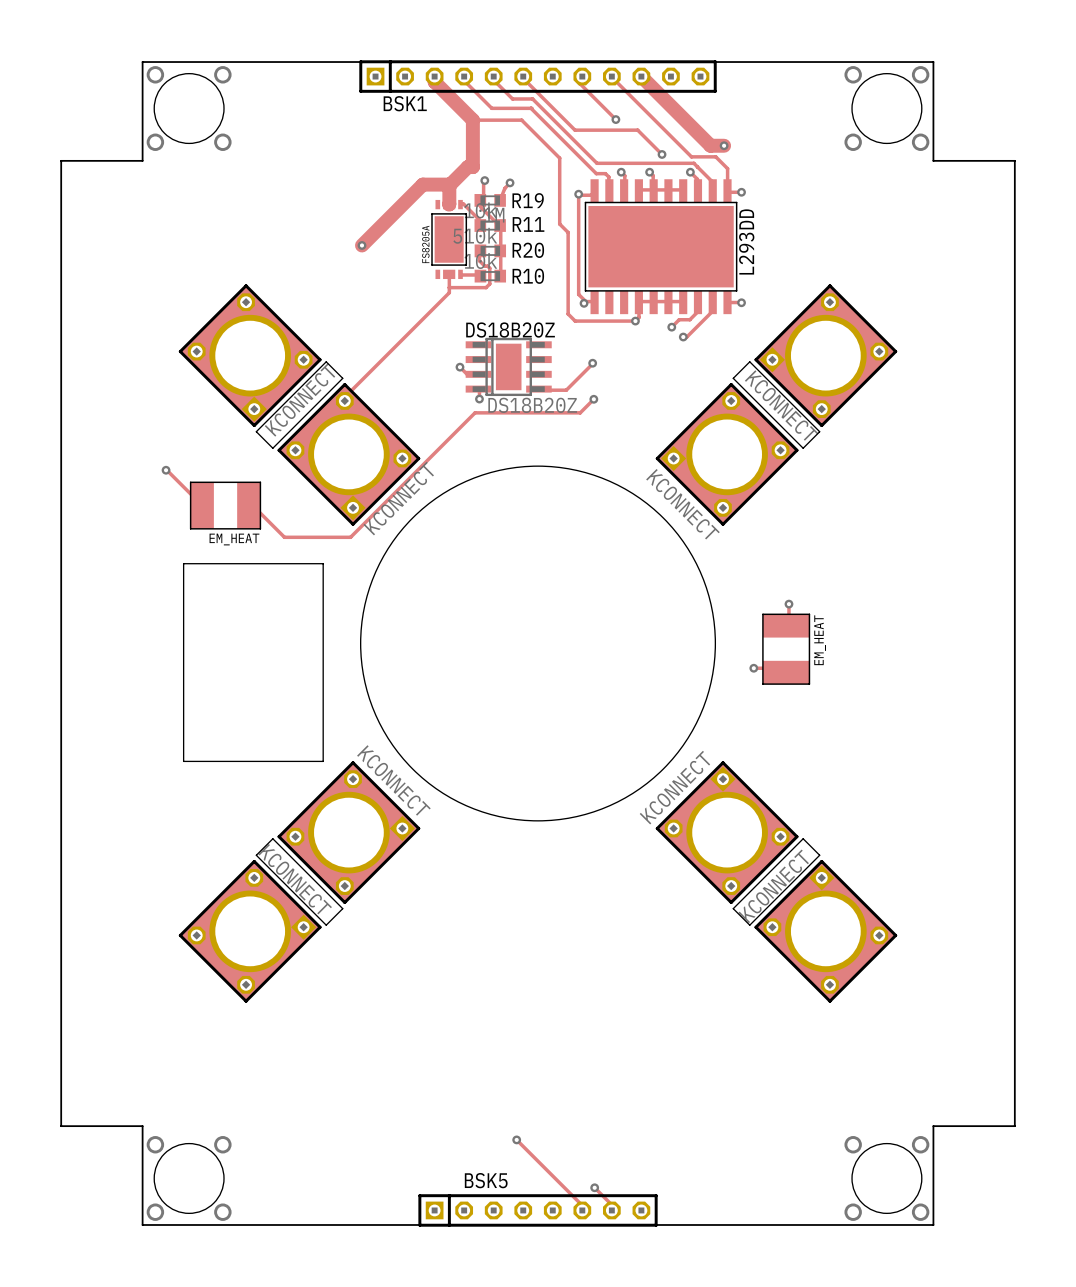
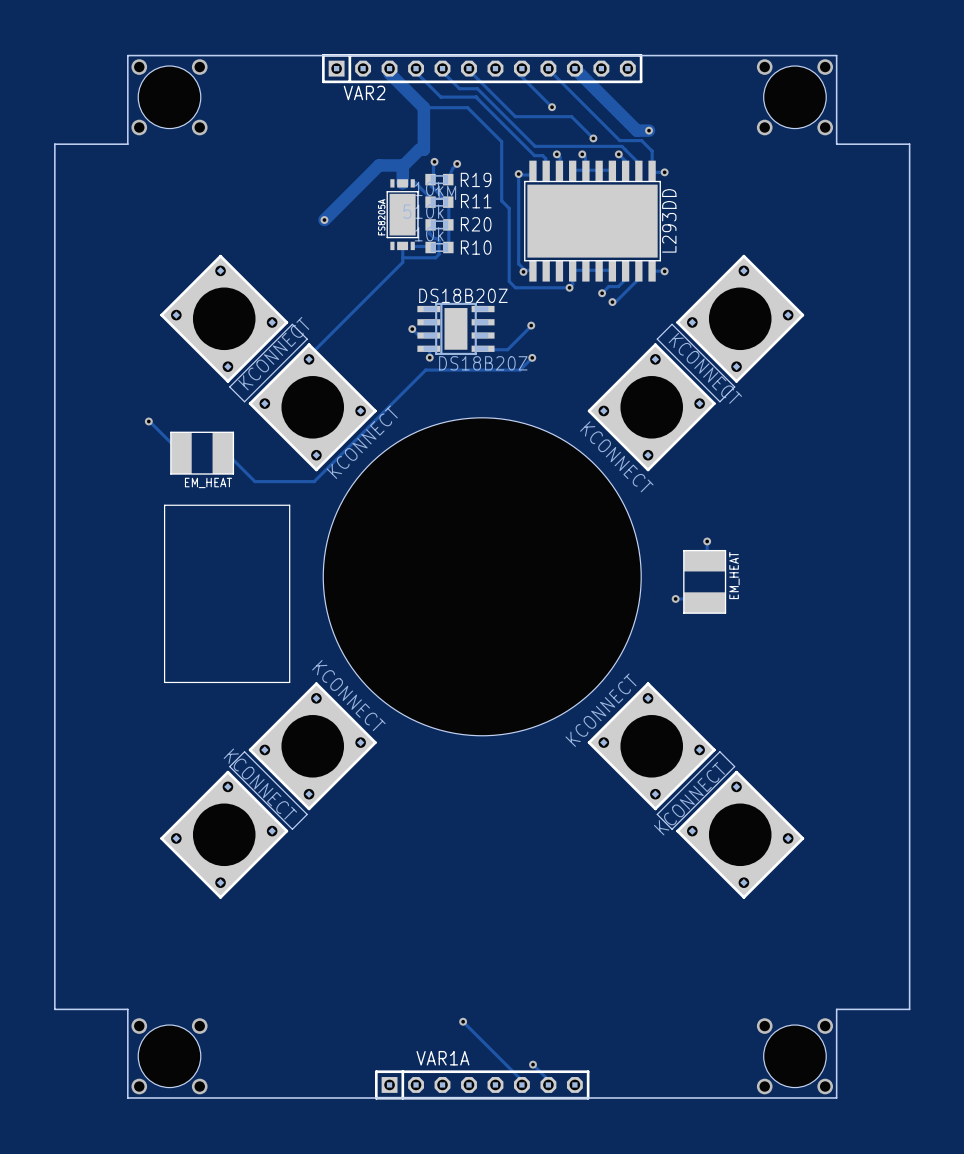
BSK1 name: BSK1 (405, 103) -> VAR2 (364, 92)
BSK5 name: BSK5 (486, 1180) -> VAR1A (442, 1058)

